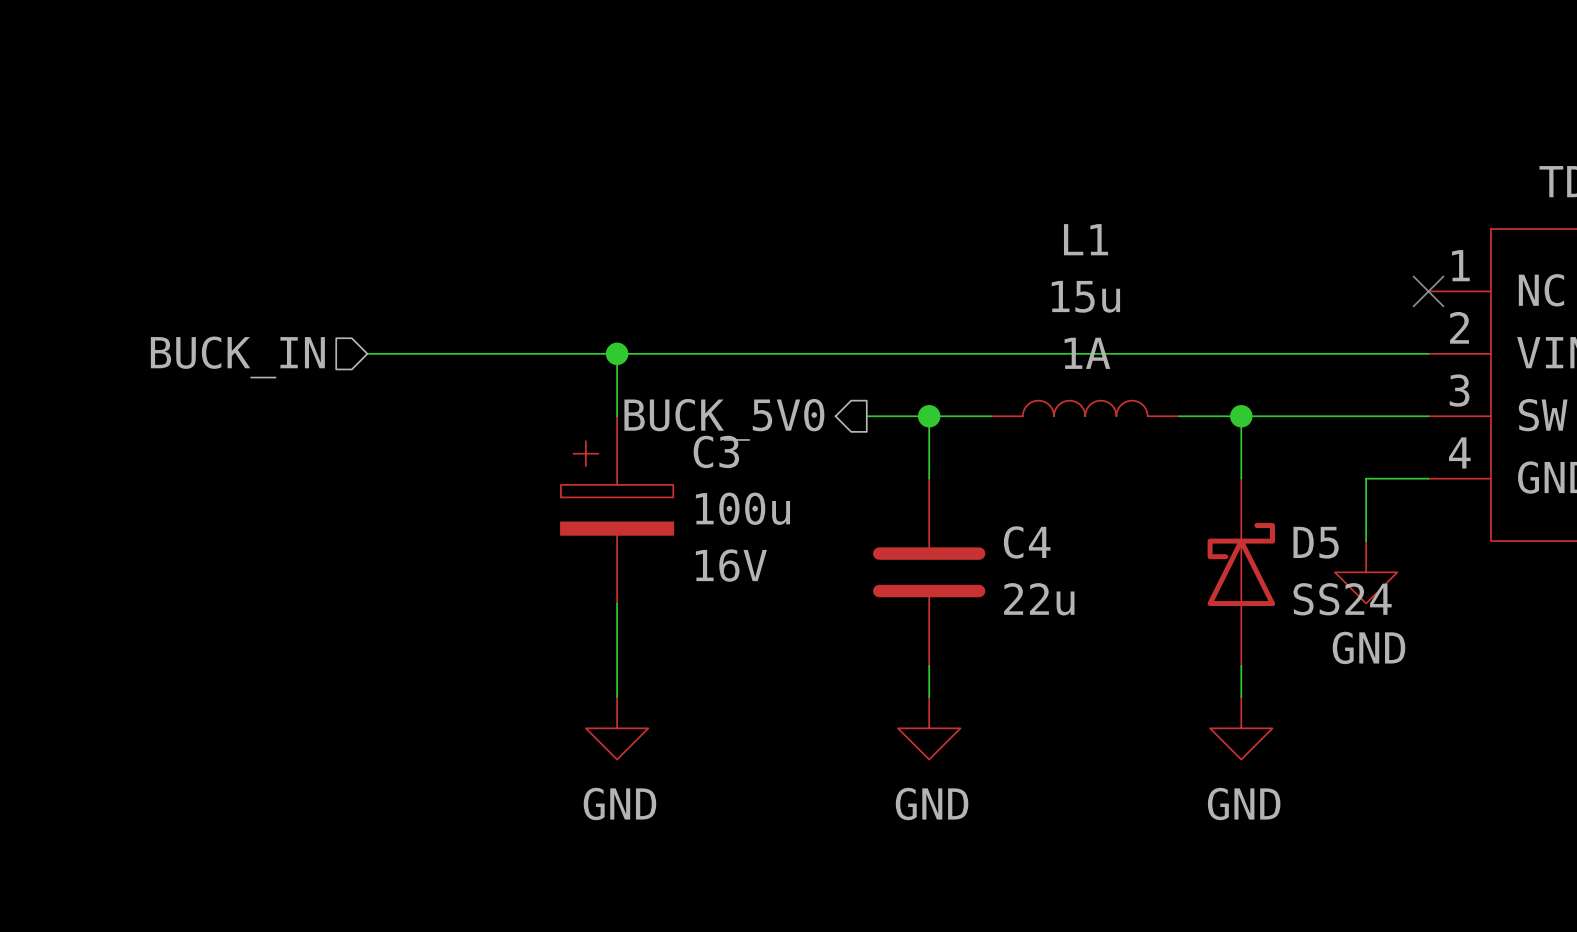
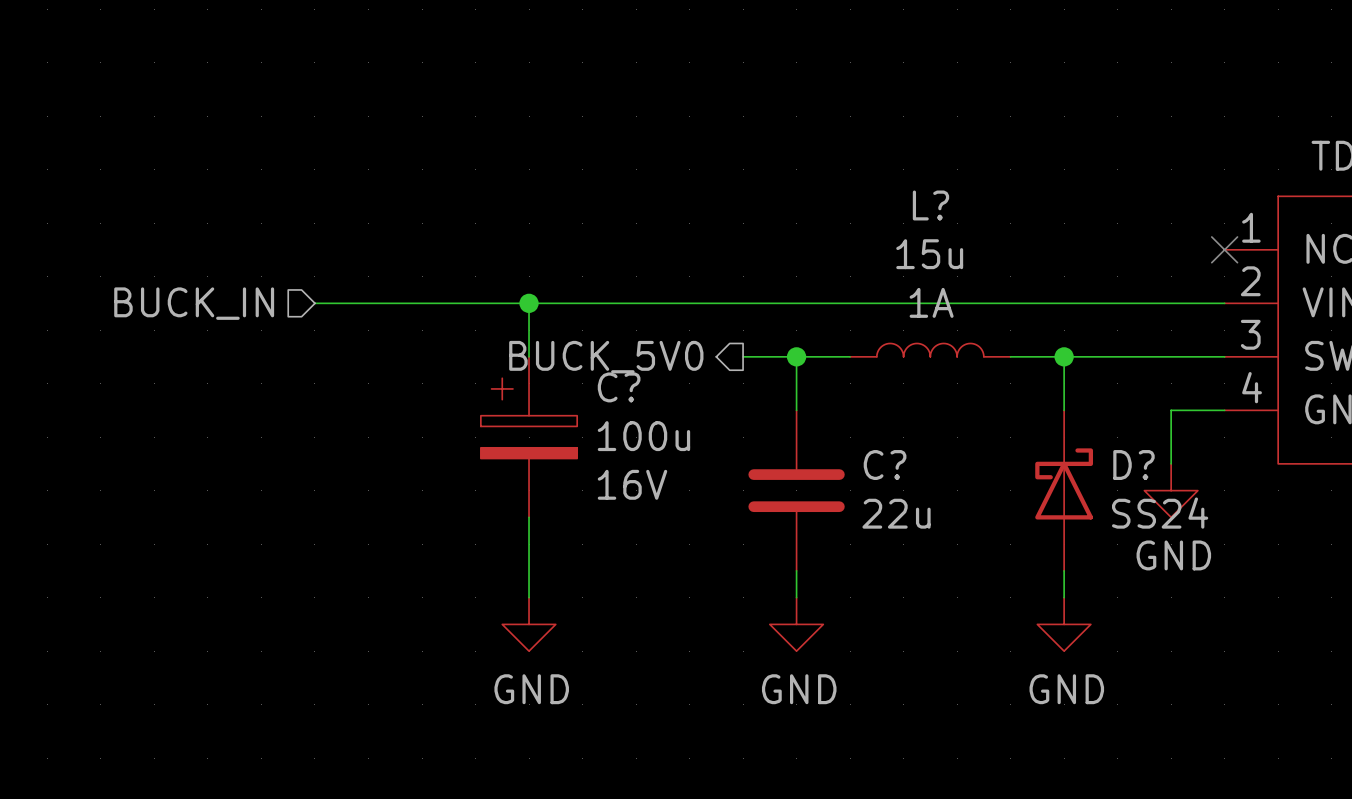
L1 name: L1 (1086, 239) -> L? (930, 205)
C3 name: C3 (716, 451) -> C? (619, 387)
C4 name: C4 (1027, 542) -> C? (885, 465)
D5 name: D5 (1316, 542) -> D? (1133, 465)

